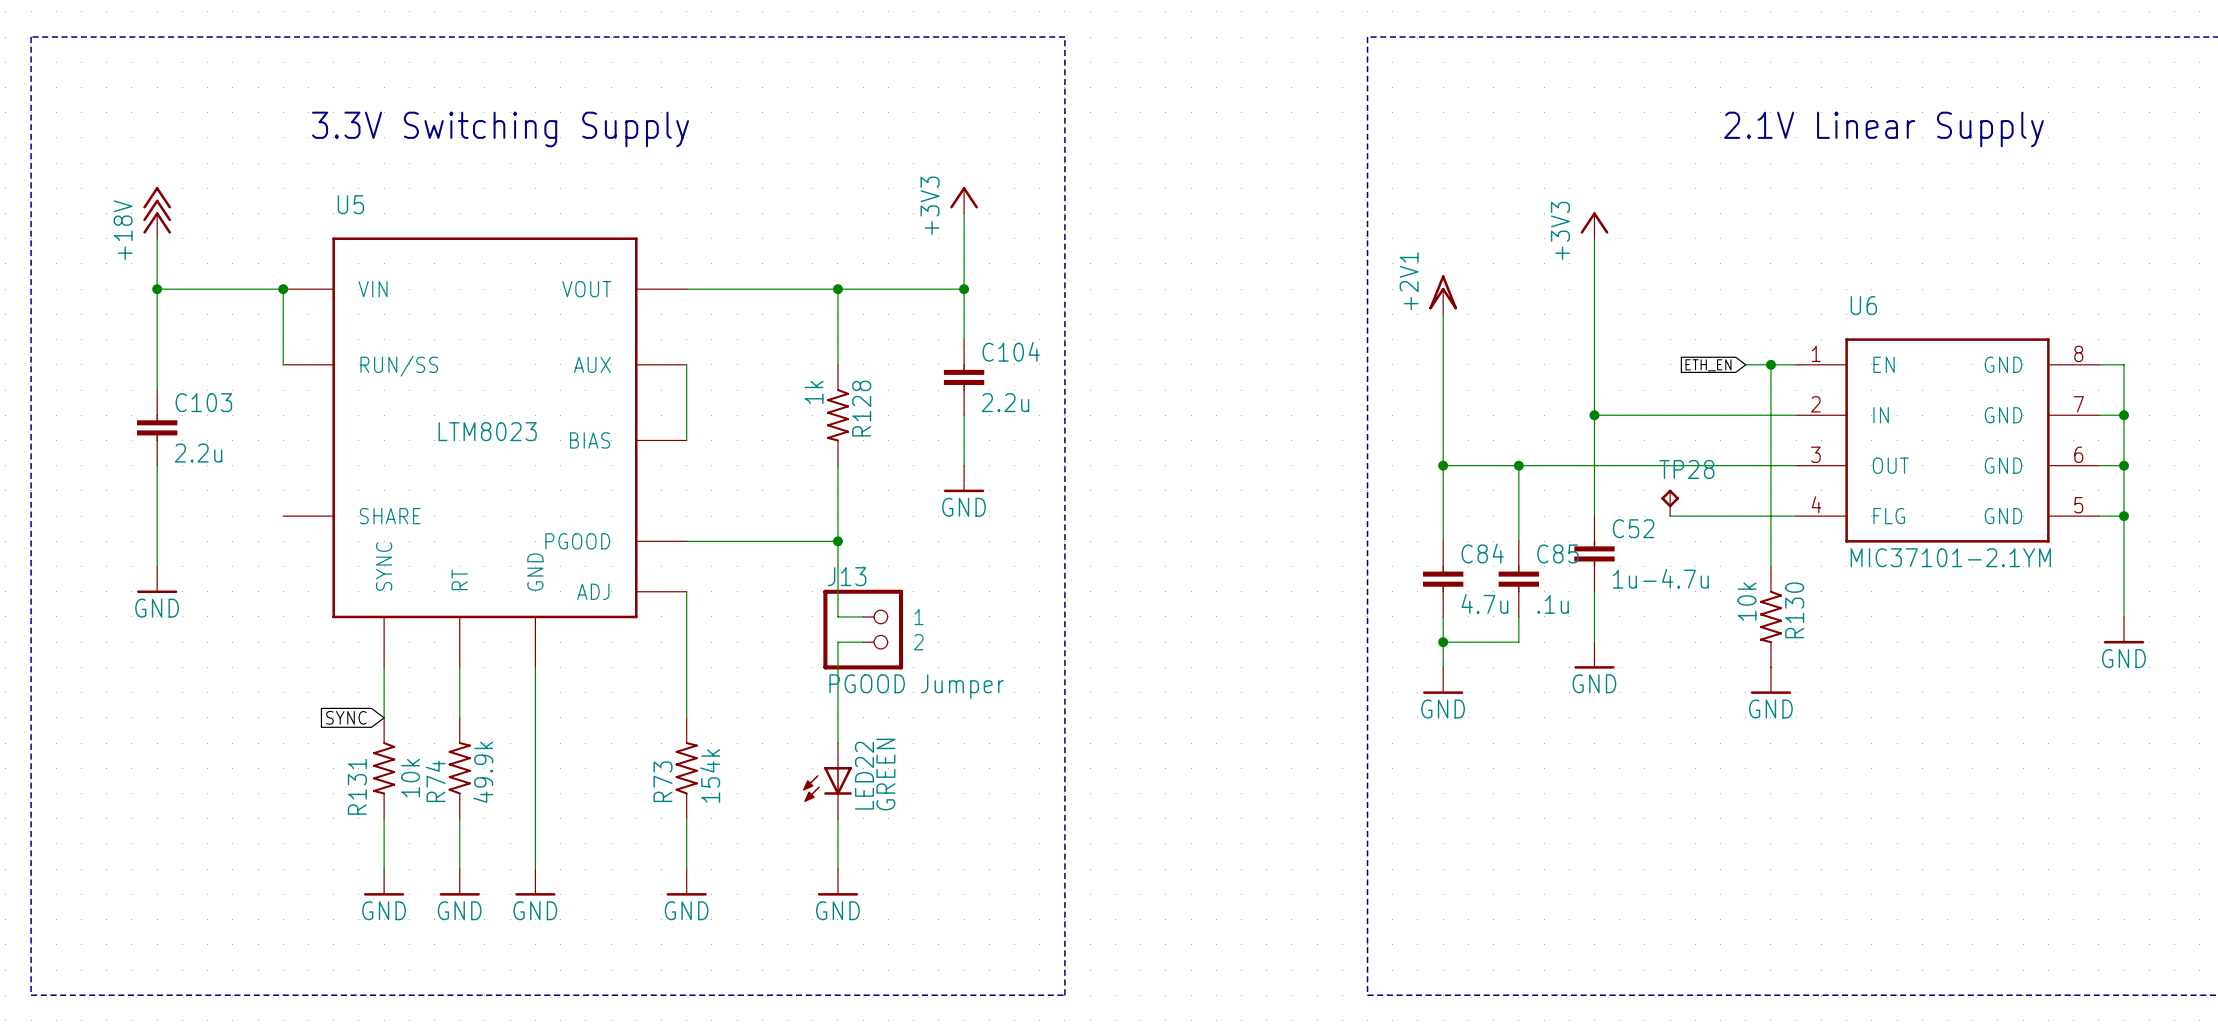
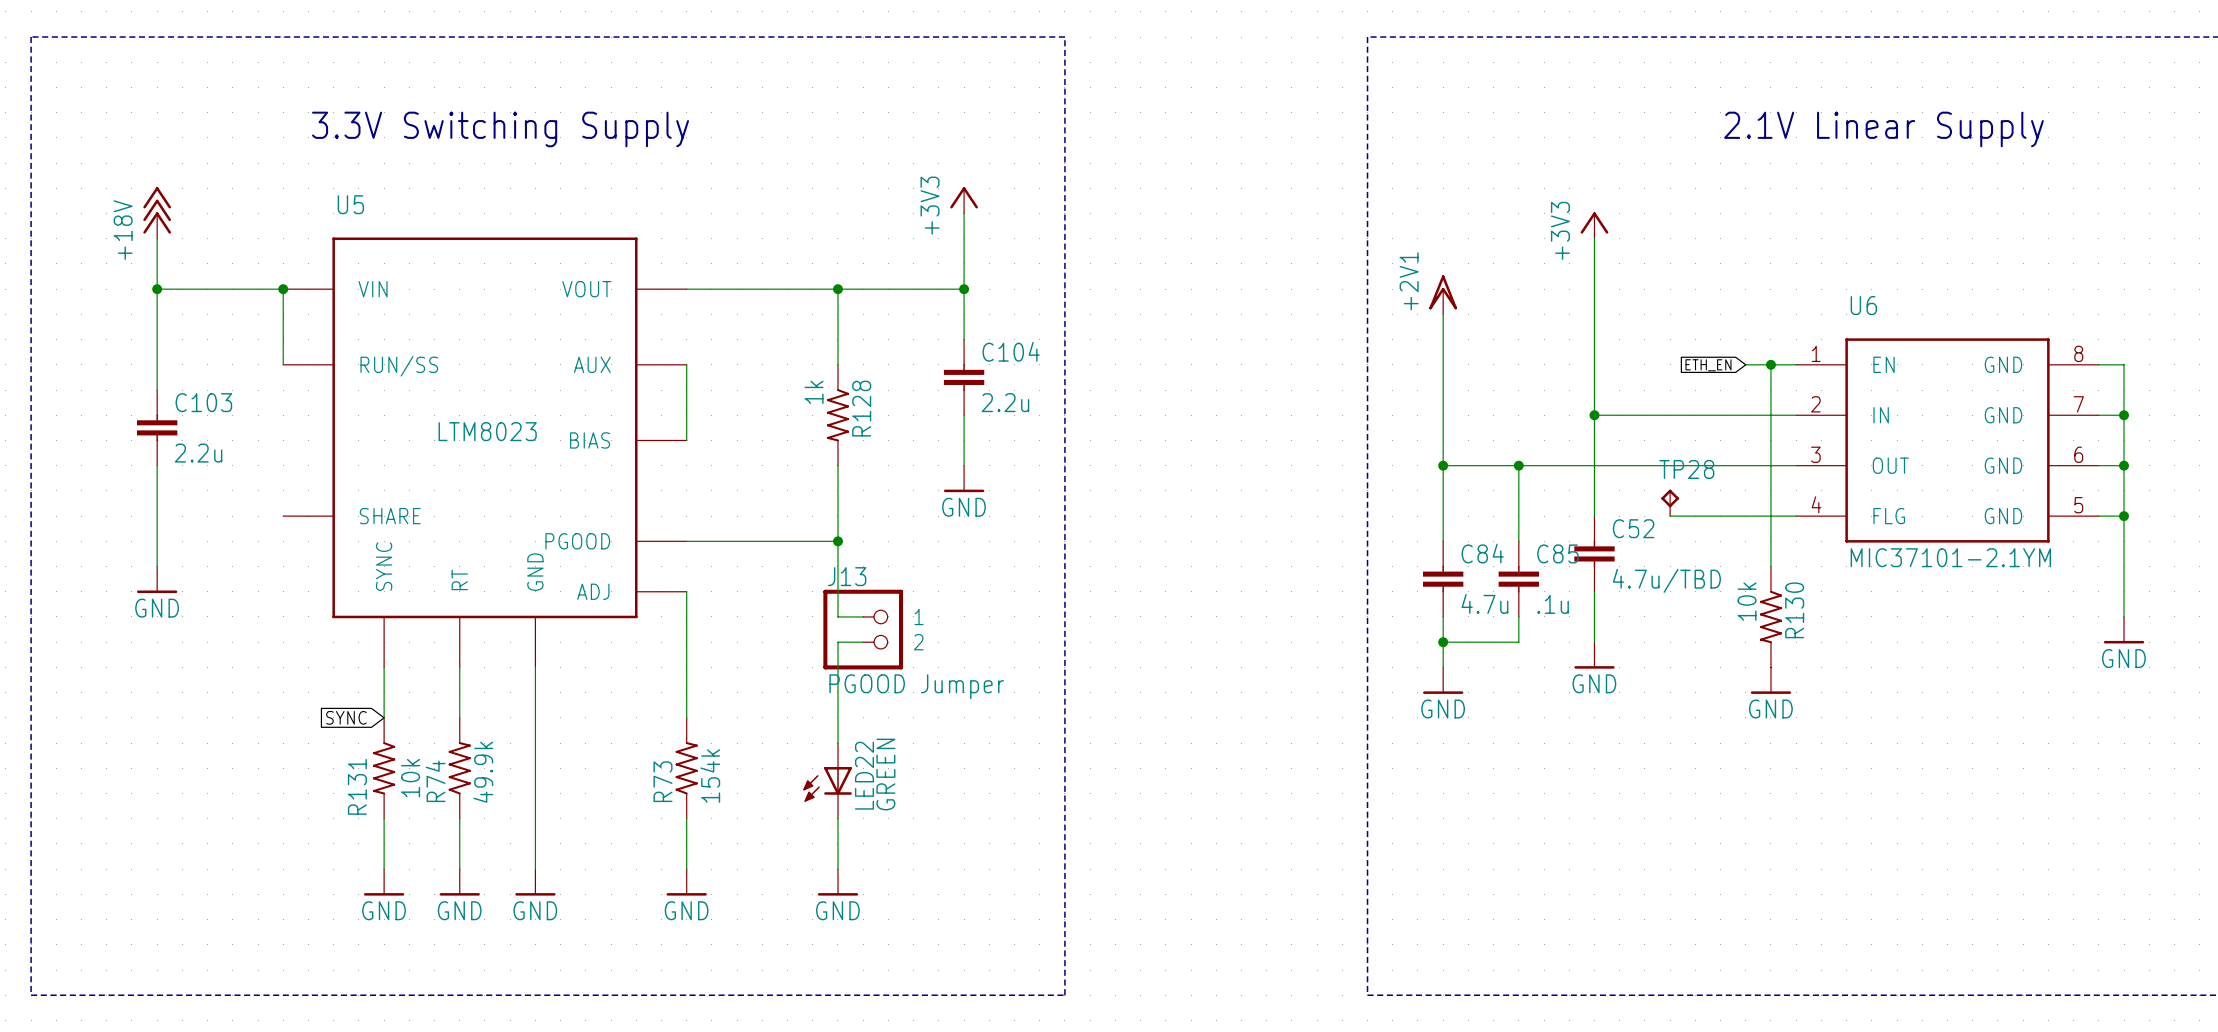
C52 value: 1u-4.7u (1660, 578) -> 4.7u/TBD (1666, 580)

